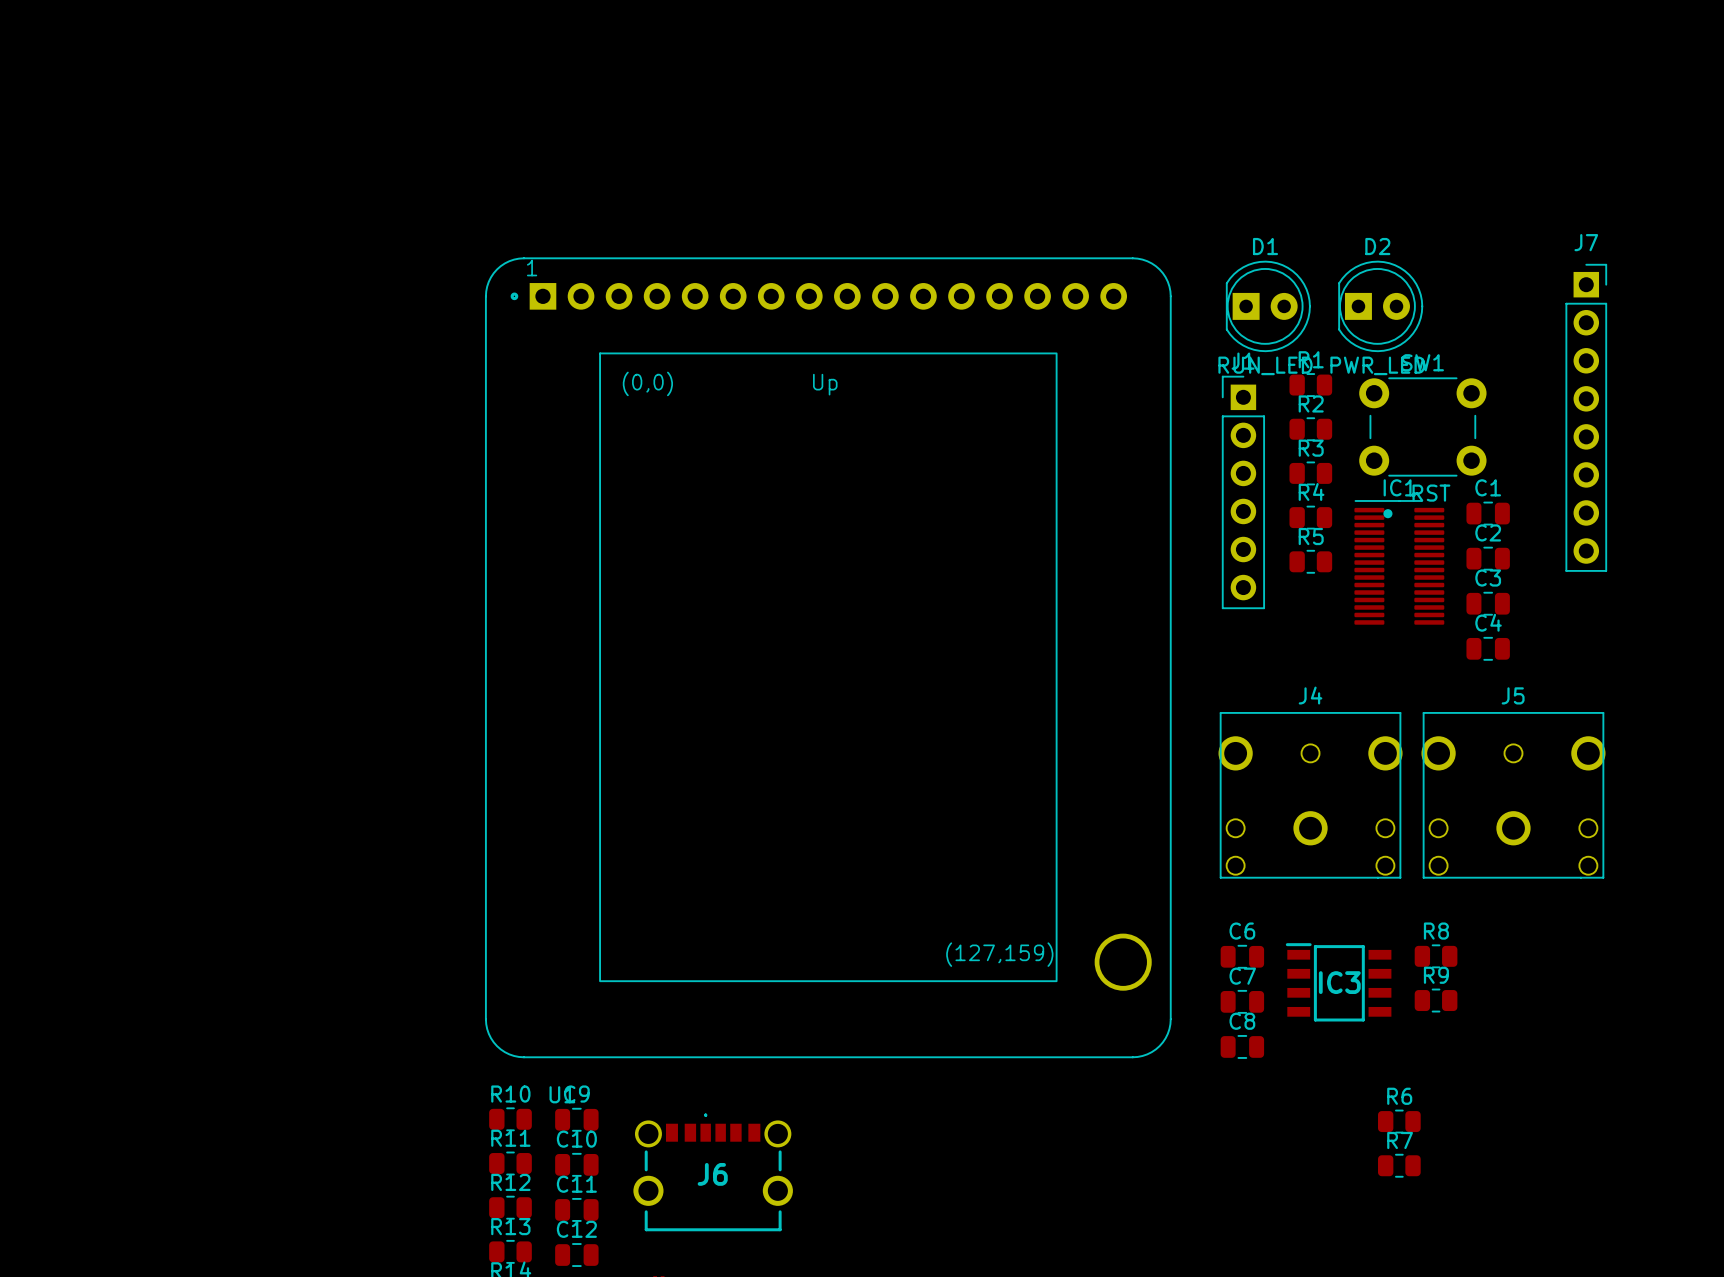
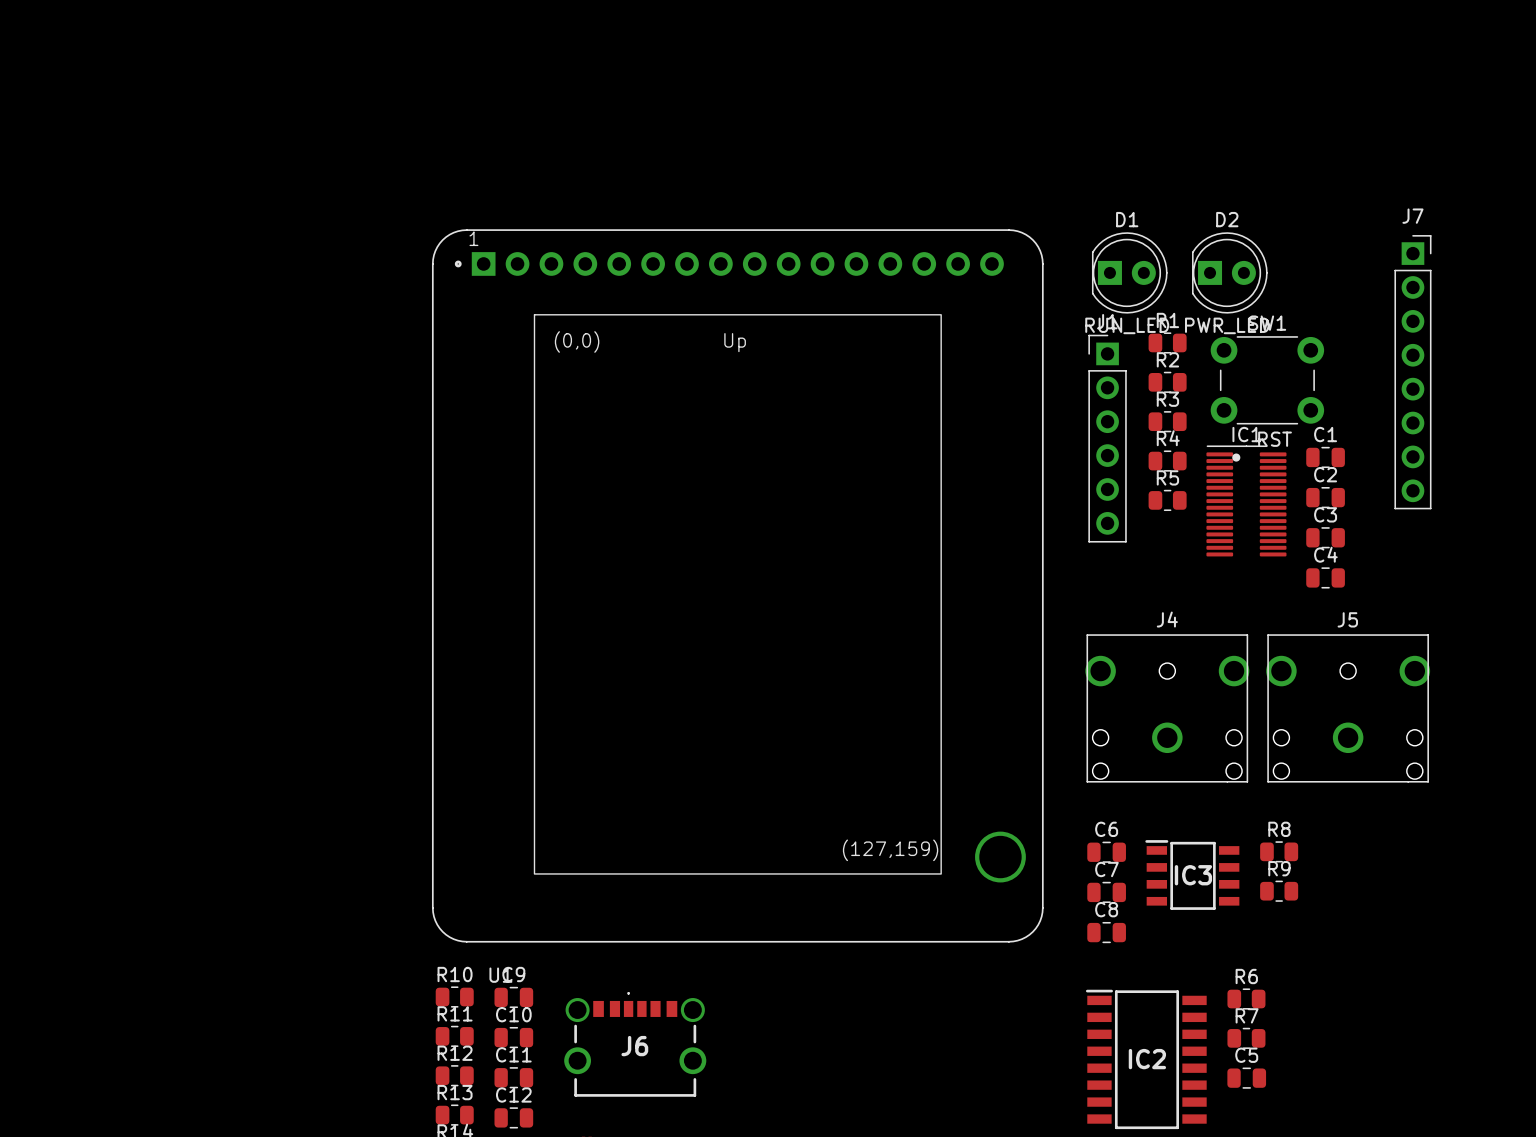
IC2: none -> (1146, 1059)
C5: none -> (1246, 1078)

